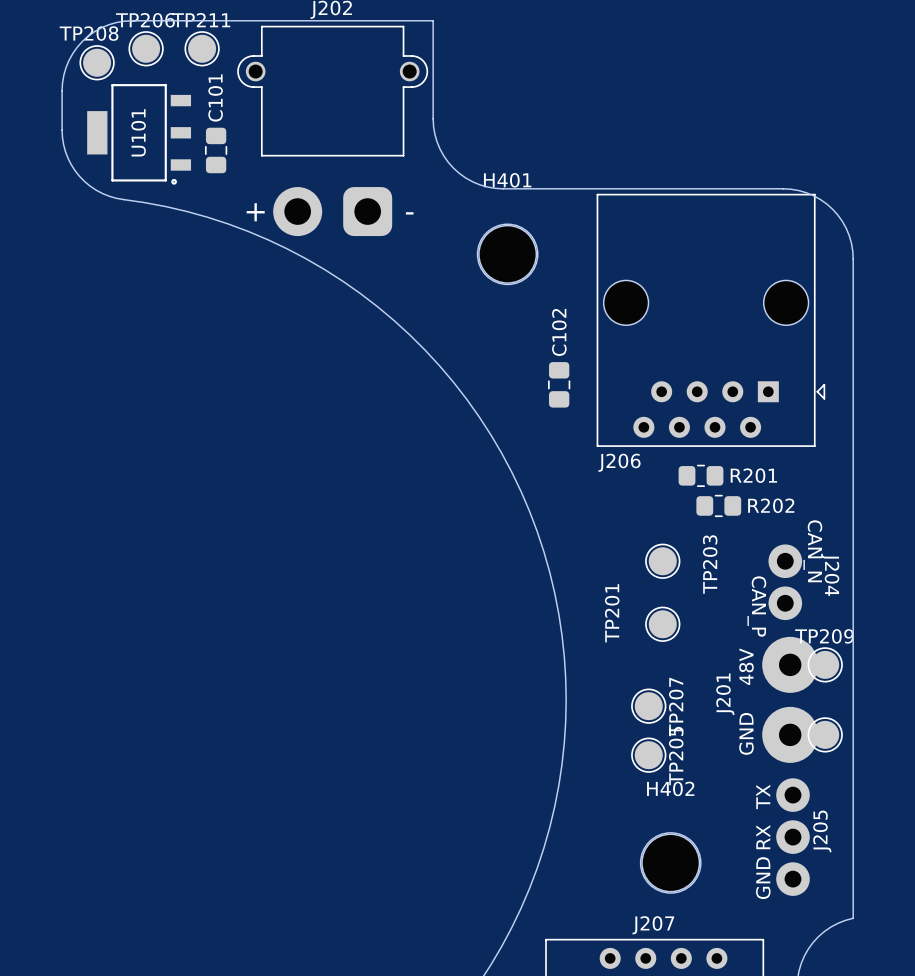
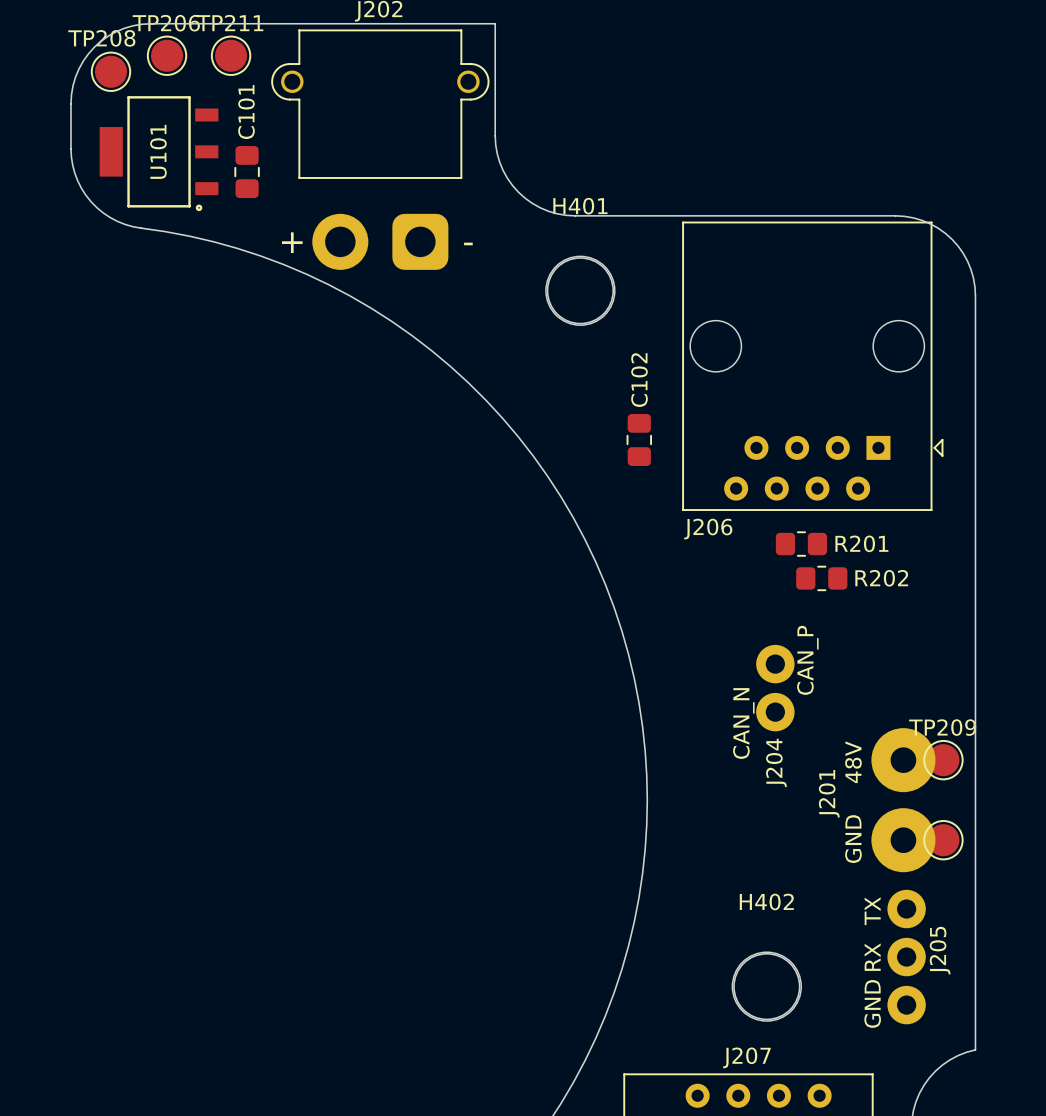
TP203: (662, 561) -> none
J204 name position: J204 (830, 574) -> J204 (776, 762)
J204 rotation: 0° (785, 582) -> 180° (775, 688)
J204 position: (785, 582) -> (775, 688)
TP201: (662, 624) -> none
TP207: (648, 706) -> none
TP205: (648, 755) -> none

